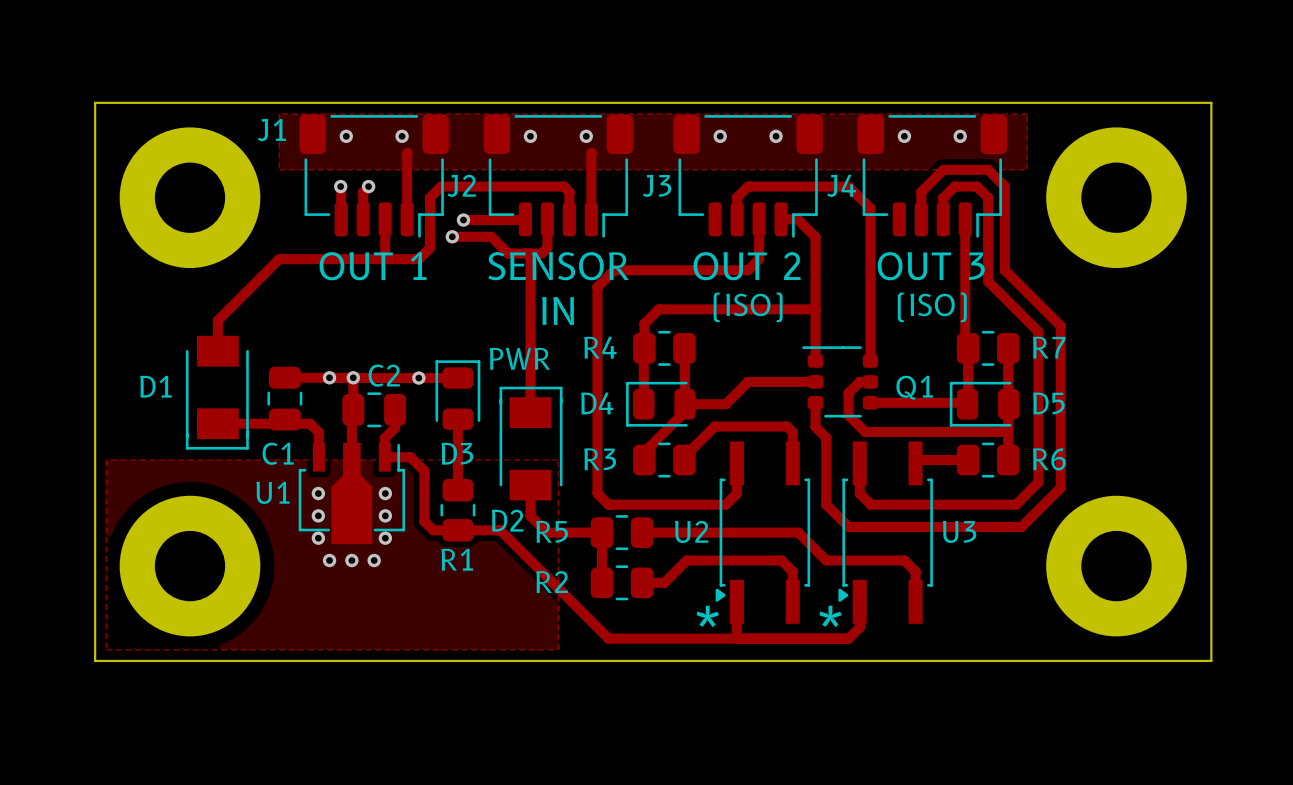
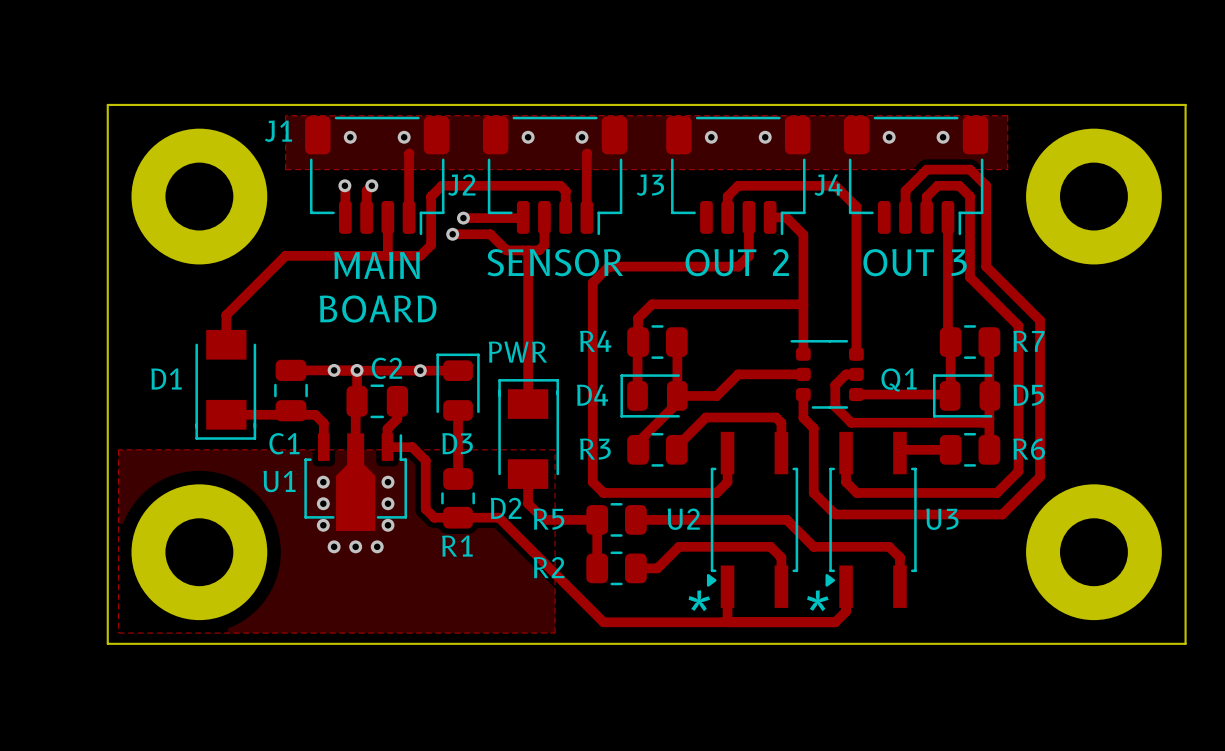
text: OUT 1 (373, 266) -> MAIN (376, 265)
text: (ISO) (748, 307) -> none
text: (ISO) (932, 307) -> none
text: IN (557, 310) -> none
text: none -> BOARD (378, 309)

